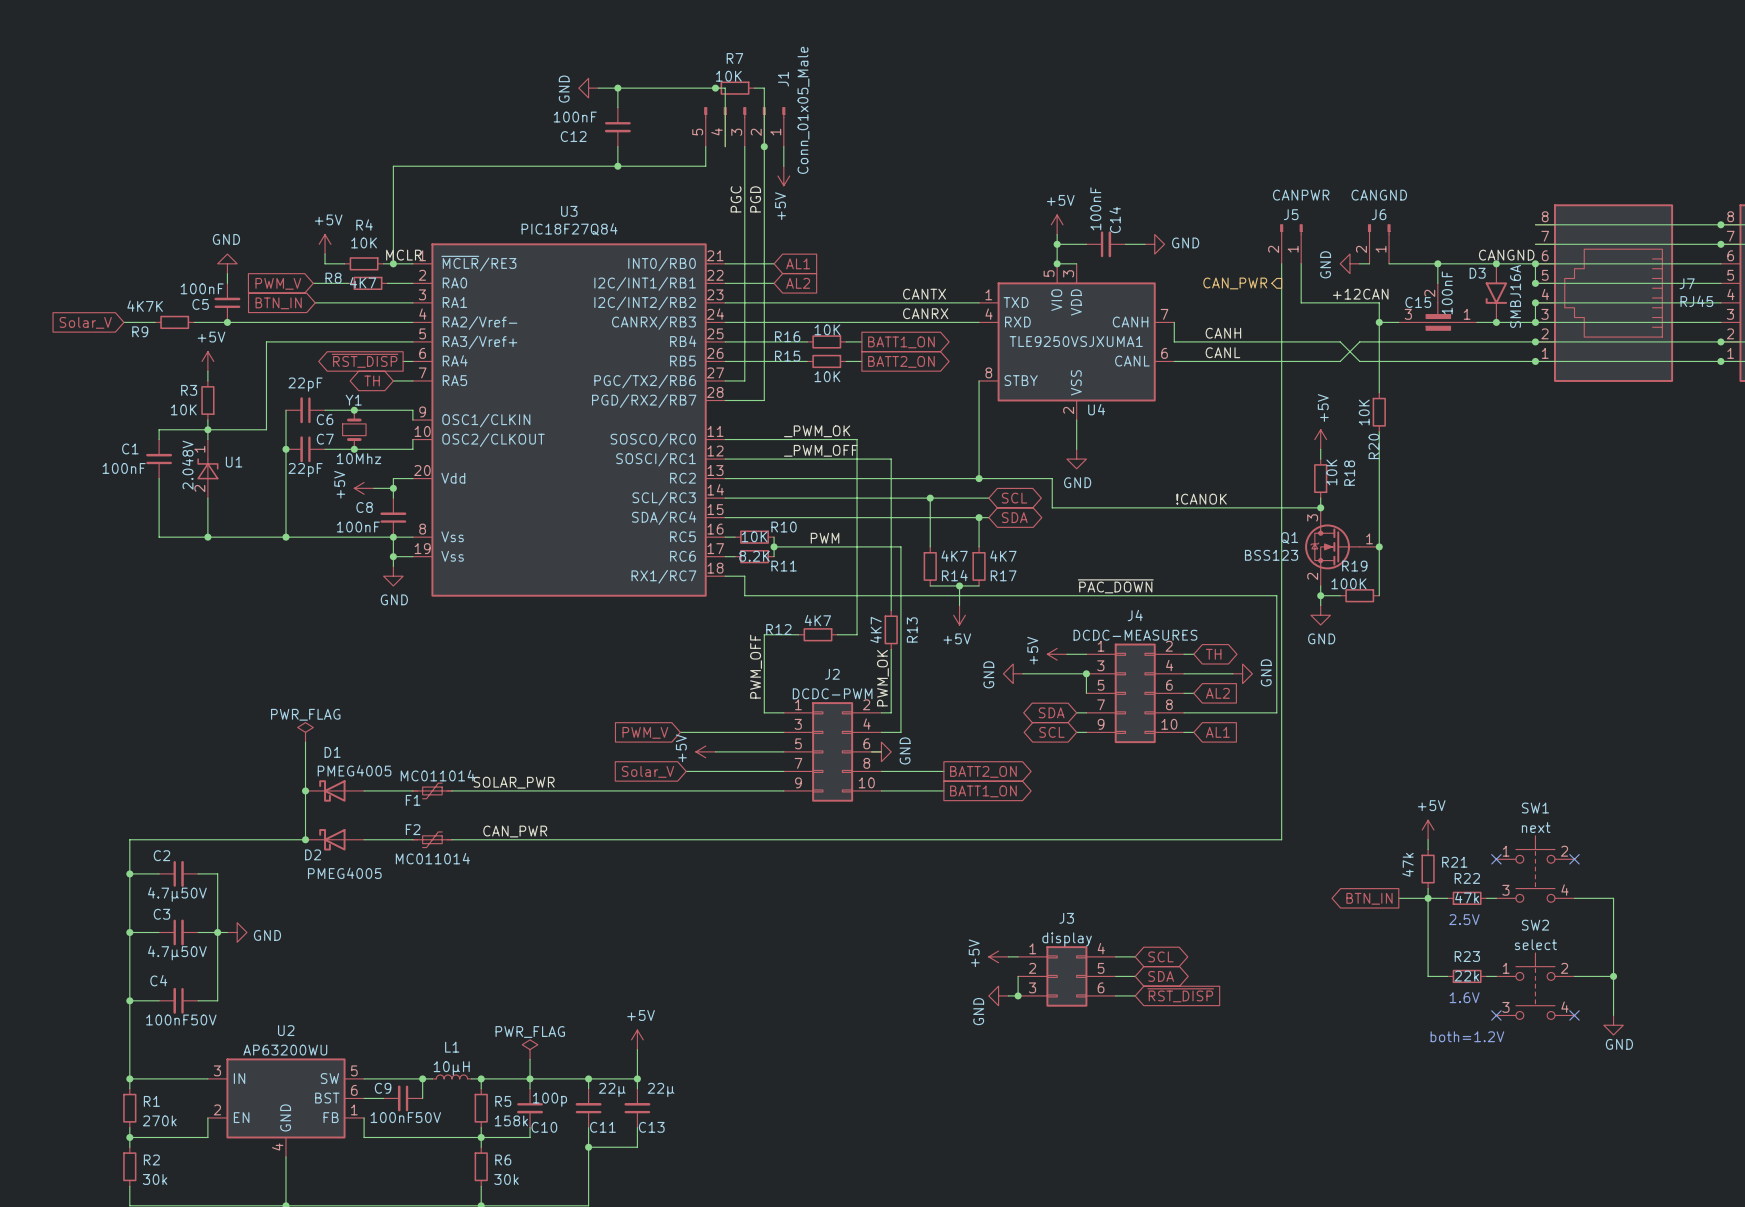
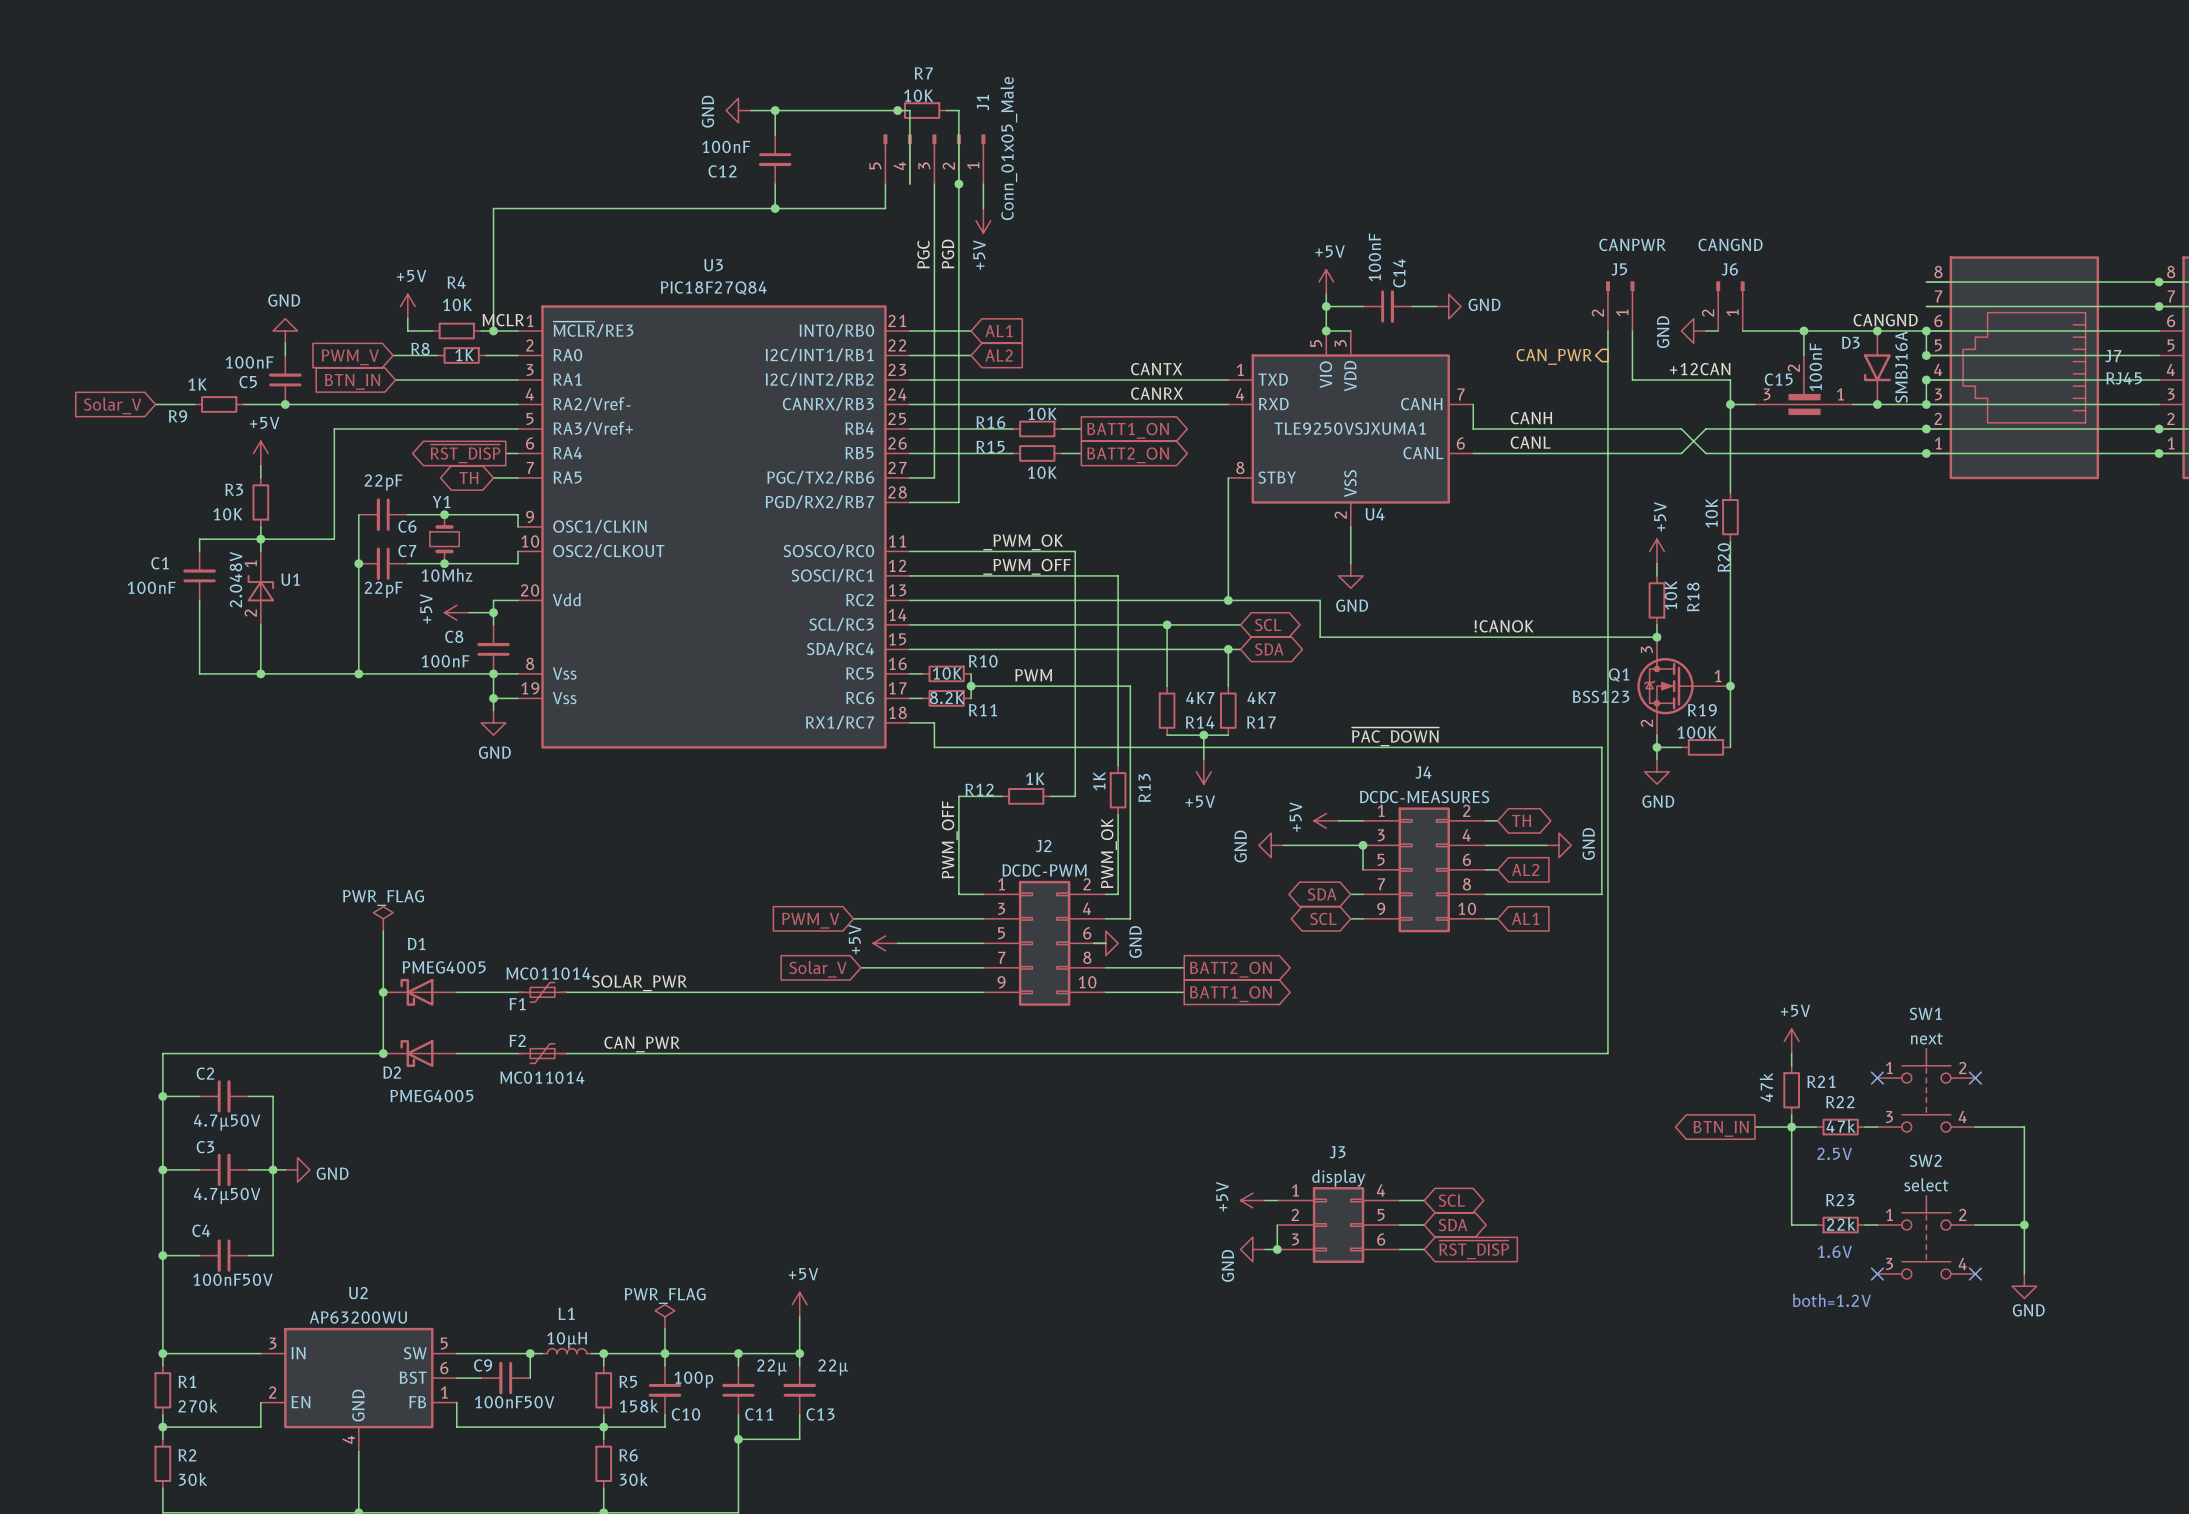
R8 value: 4K7 (363, 282) -> 1K (464, 355)
R9 value: 4K7K (145, 306) -> 1K (197, 384)
R12 value: 4K7 (817, 620) -> 1K (1035, 778)
R13 value: 4K7 (875, 629) -> 1K (1099, 781)

